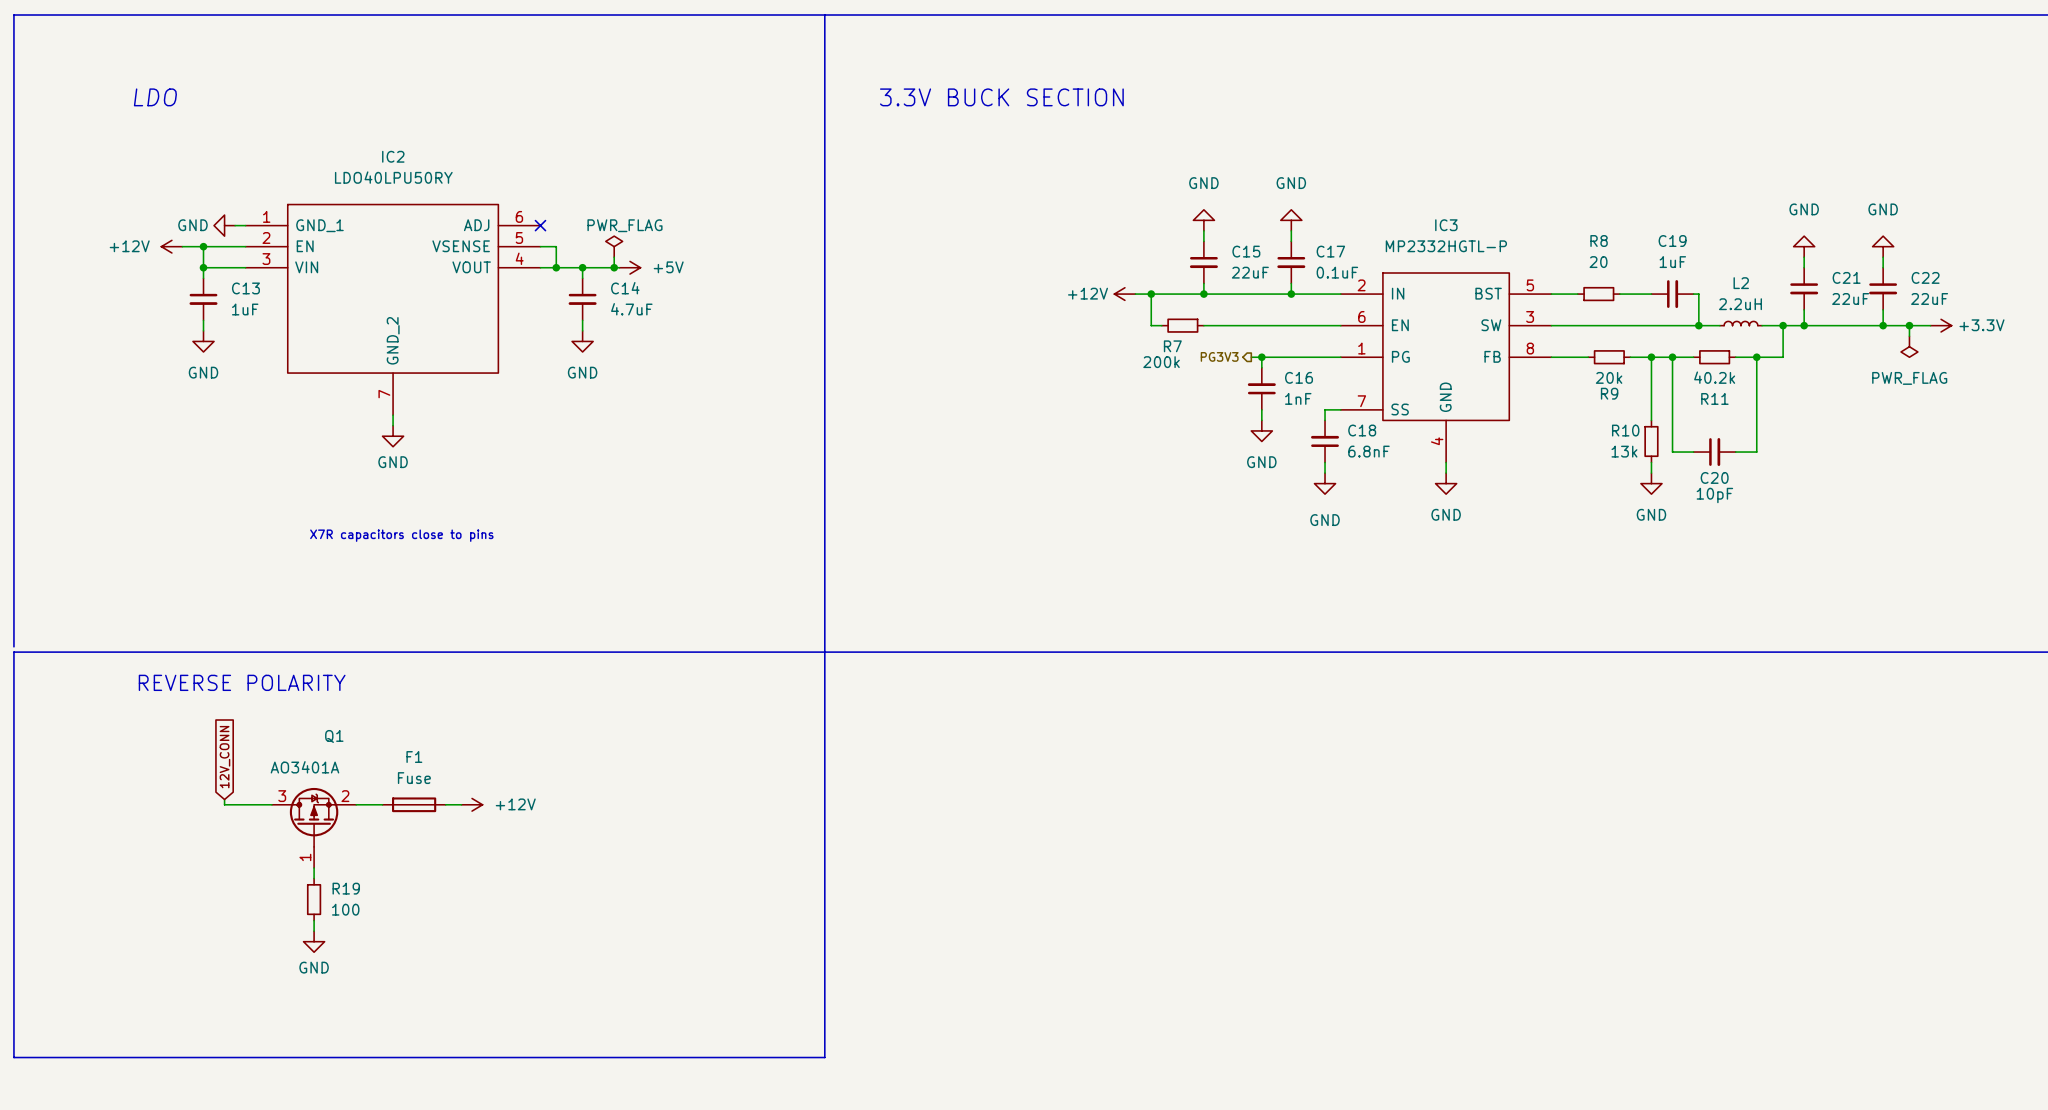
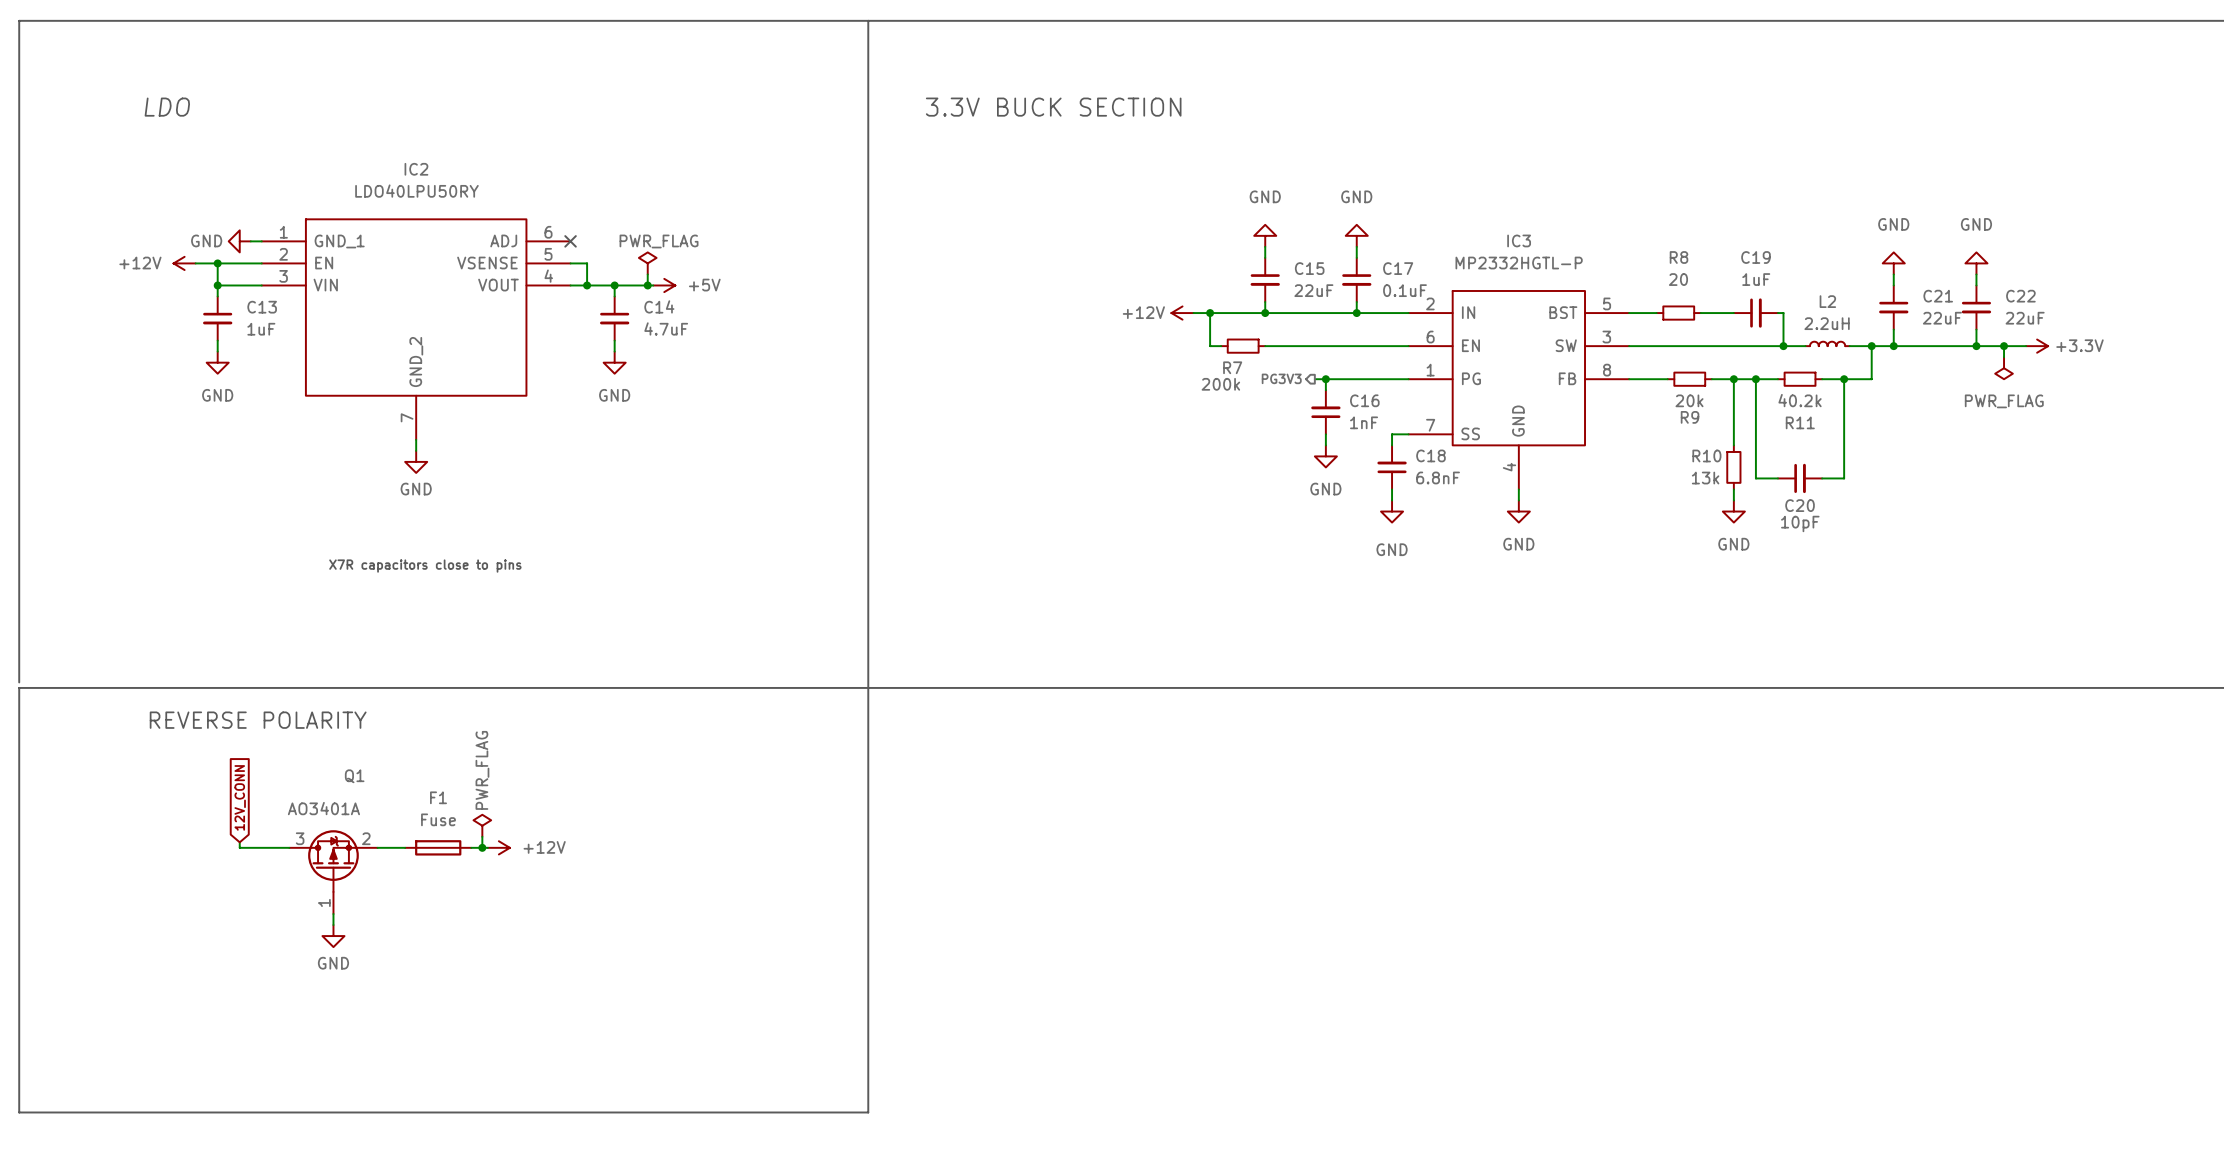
power symbol: none -> PWR_FLAG (482, 825)
junction: none -> (482, 847)
R19: 100 (314, 899) -> none
wire: (314, 920) (314, 931) -> (482, 836) (482, 847)
power symbol position: GND (314, 941) -> GND (333, 936)

